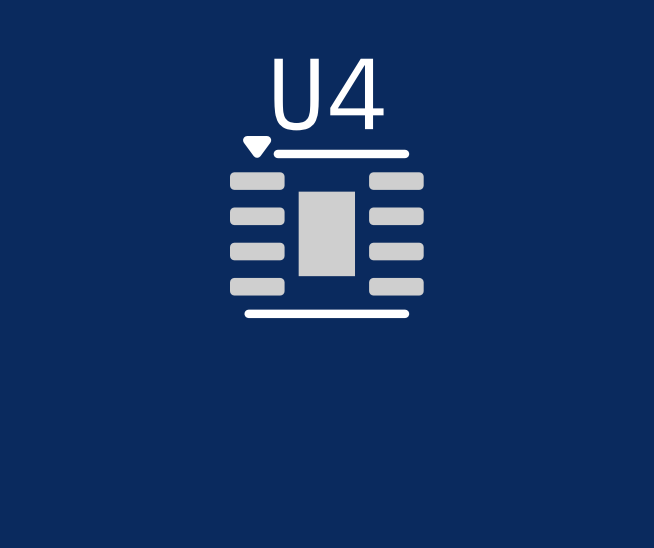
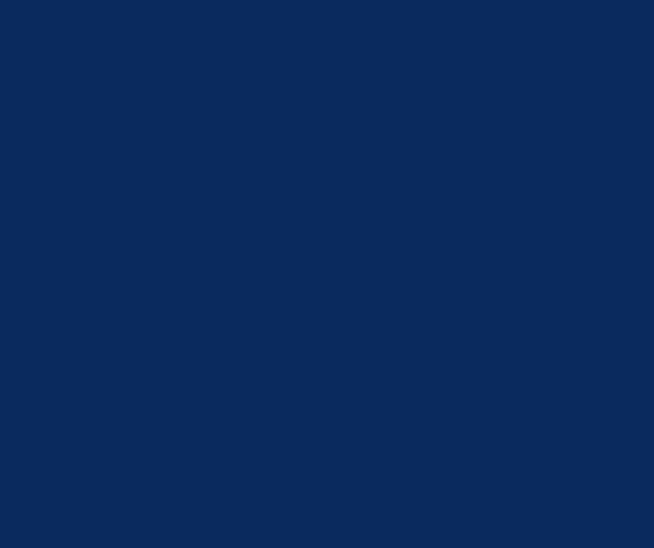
U4: (326, 227) -> none

